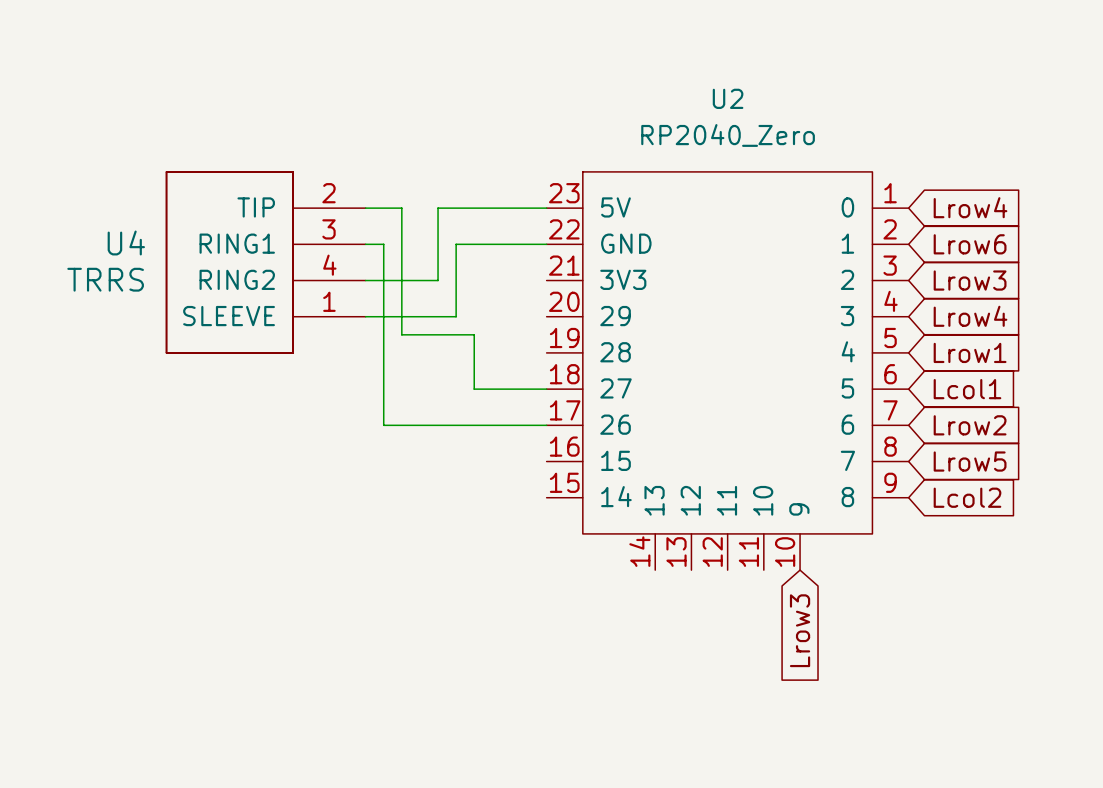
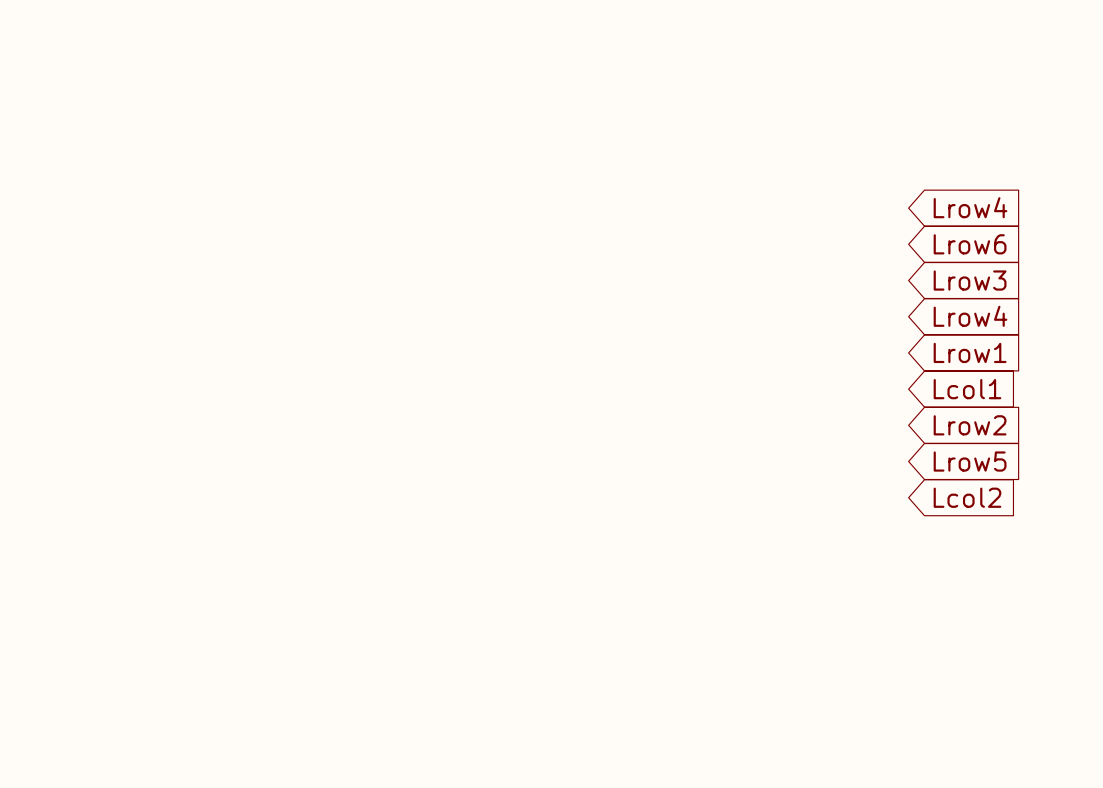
wire: (365, 208) (401, 208) (401, 334) (474, 334) (474, 389) (546, 389) -> none
wire: (546, 208) (438, 208) (438, 280) (365, 280) -> none
wire: (365, 244) (383, 244) (383, 425) (546, 425) -> none
wire: (546, 244) (456, 244) (456, 316) (365, 316) -> none
U4: TRRS (266, 262) -> none
U2: RP2040_Zero (727, 371) -> none
global label: Lrow3 (800, 630) -> none

